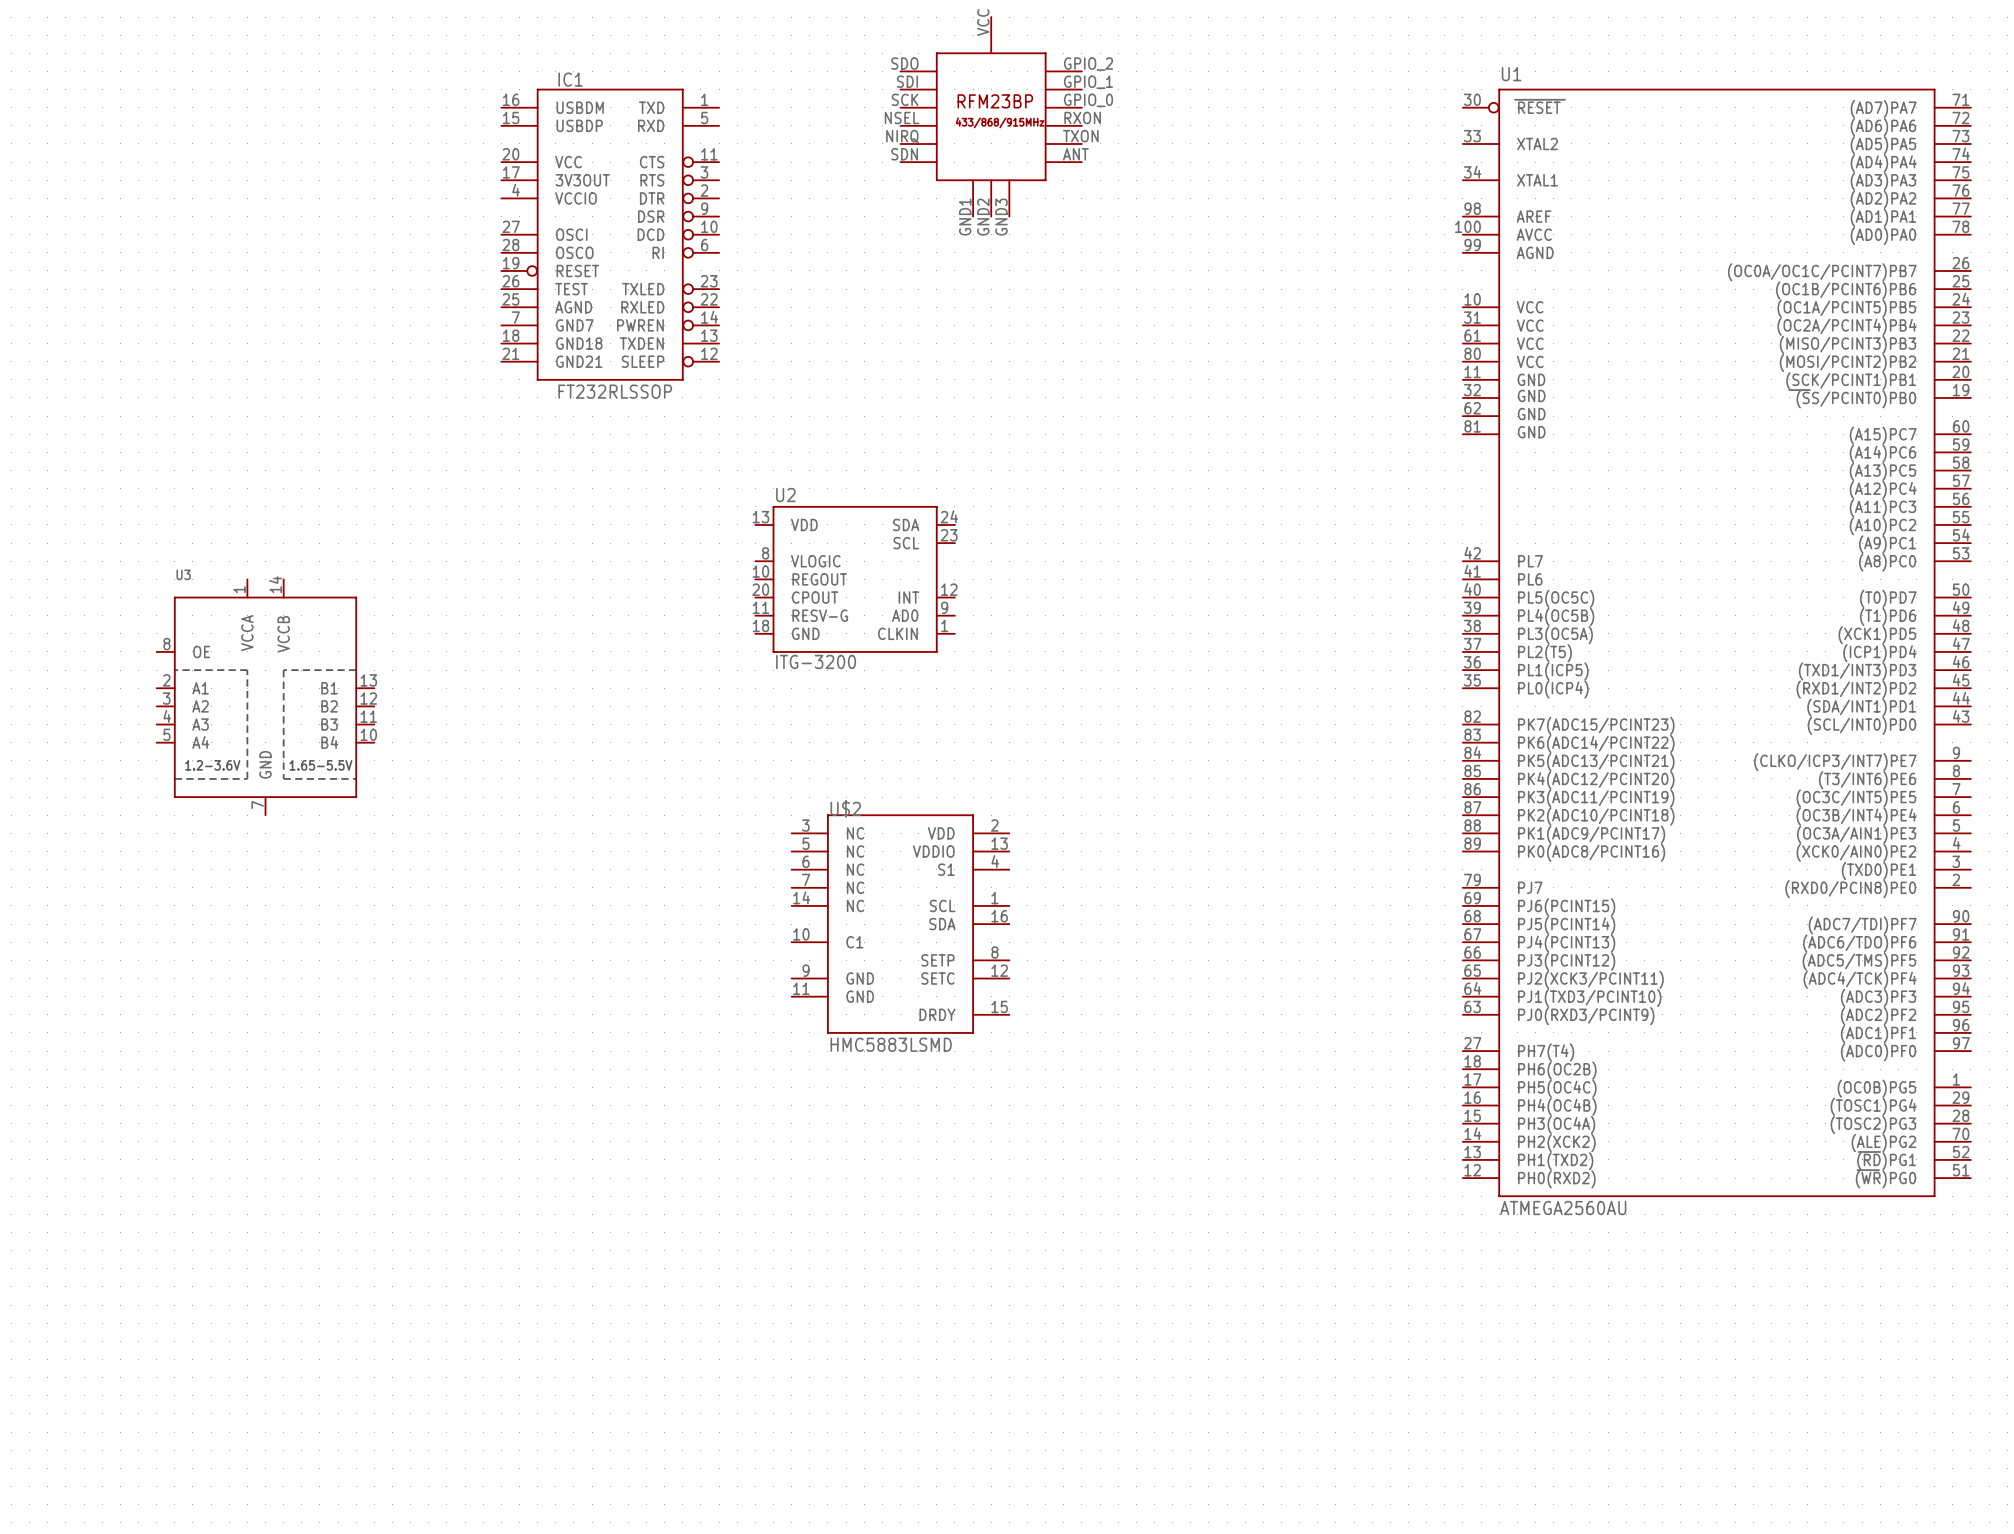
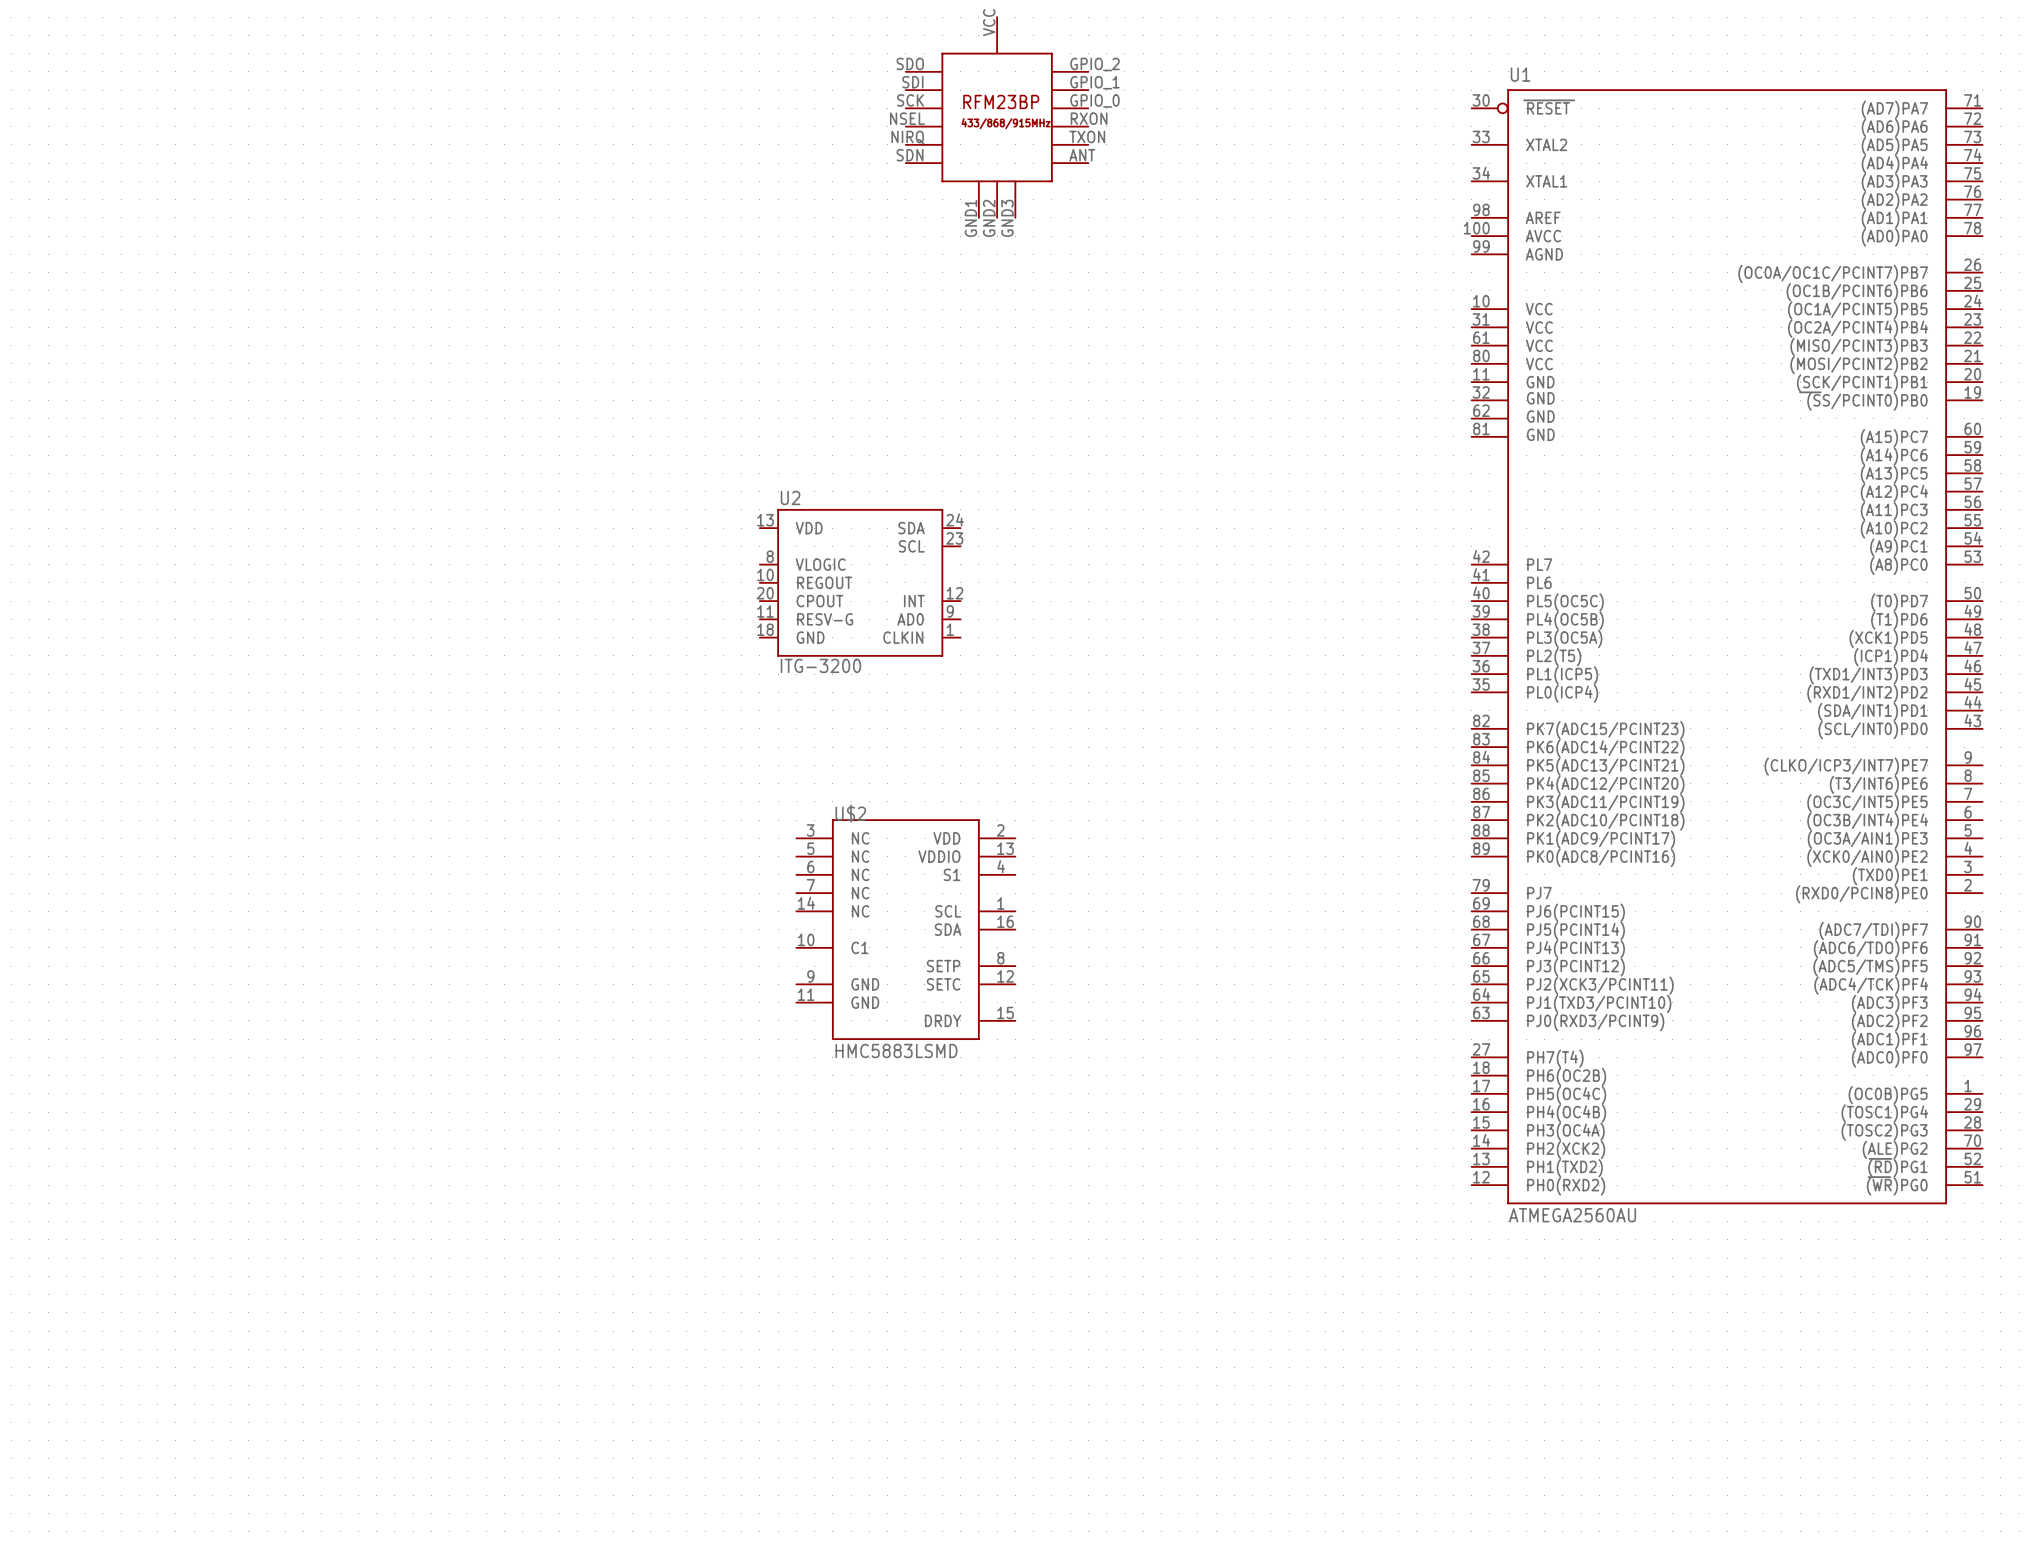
IC1: FT232RLSSOP (610, 234) -> none
U3: (265, 697) -> none

